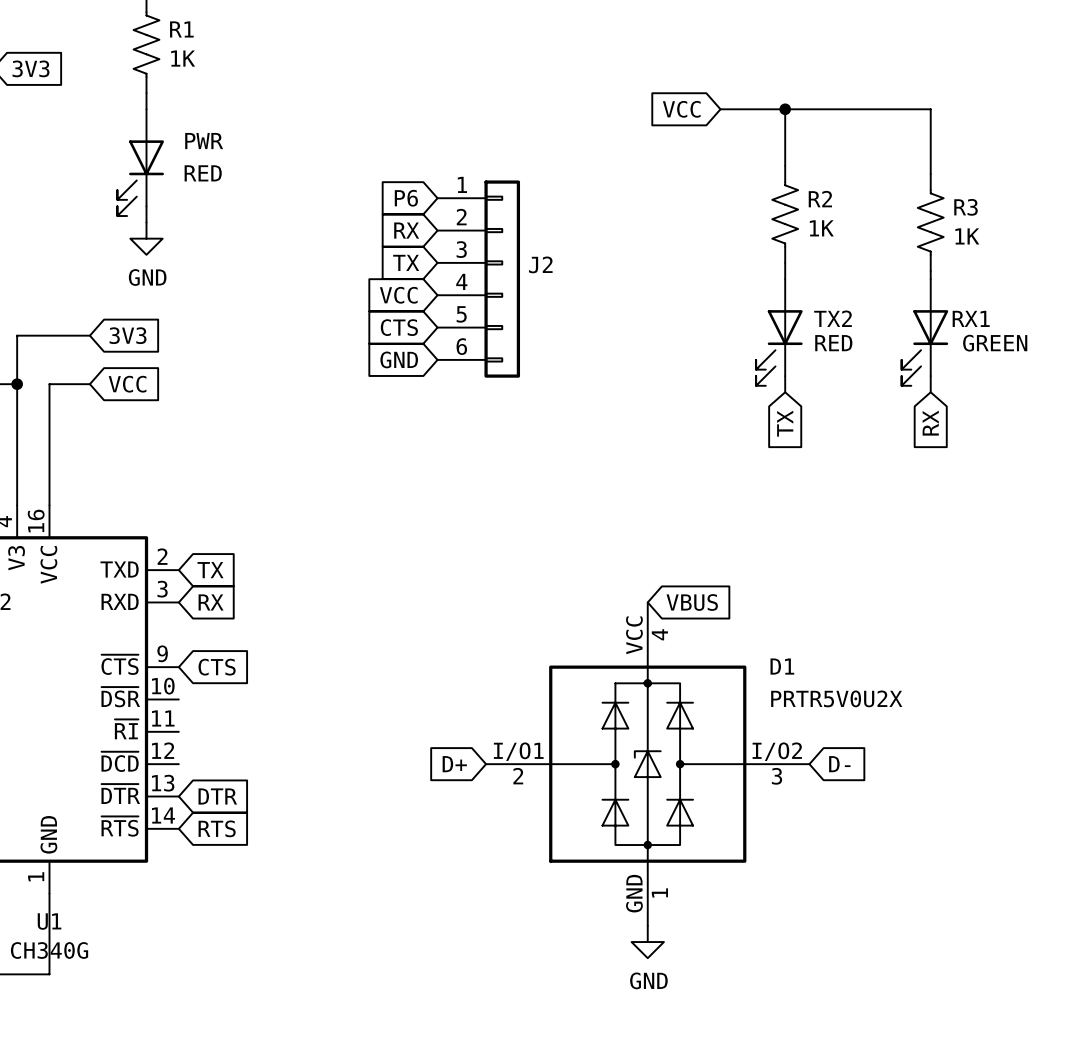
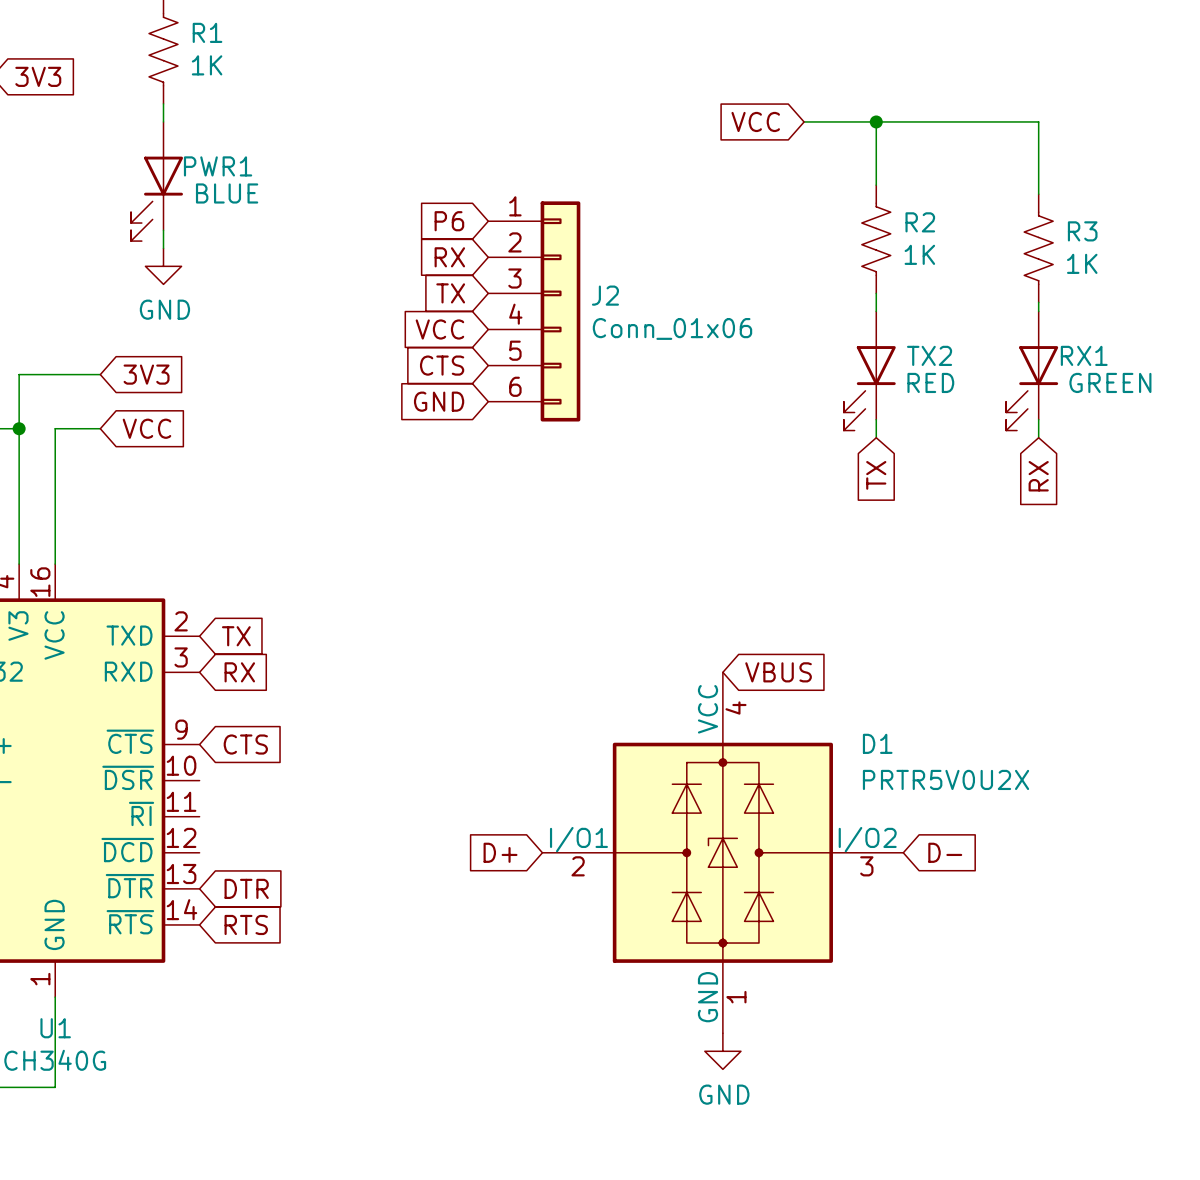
PWR name: PWR (204, 141) -> PWR1 (218, 166)
PWR value: RED (203, 173) -> BLUE (227, 193)
J2 value: none -> Conn_01x06 (672, 328)

